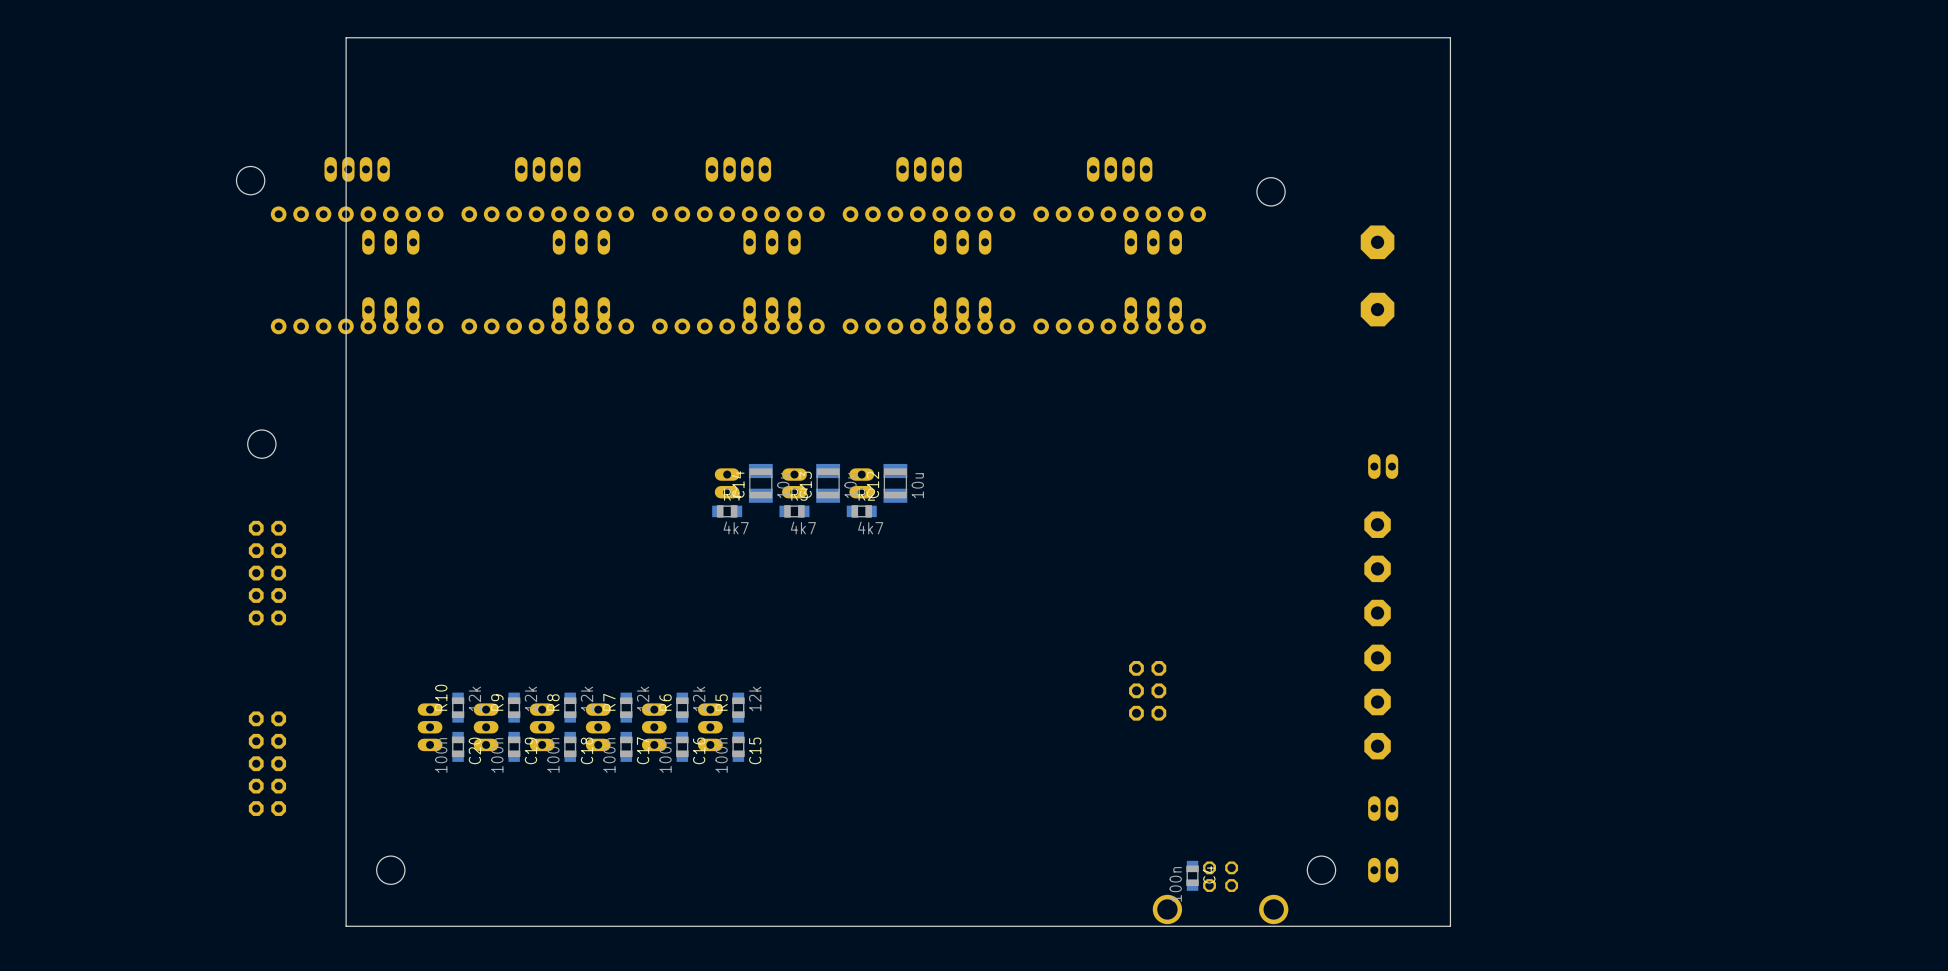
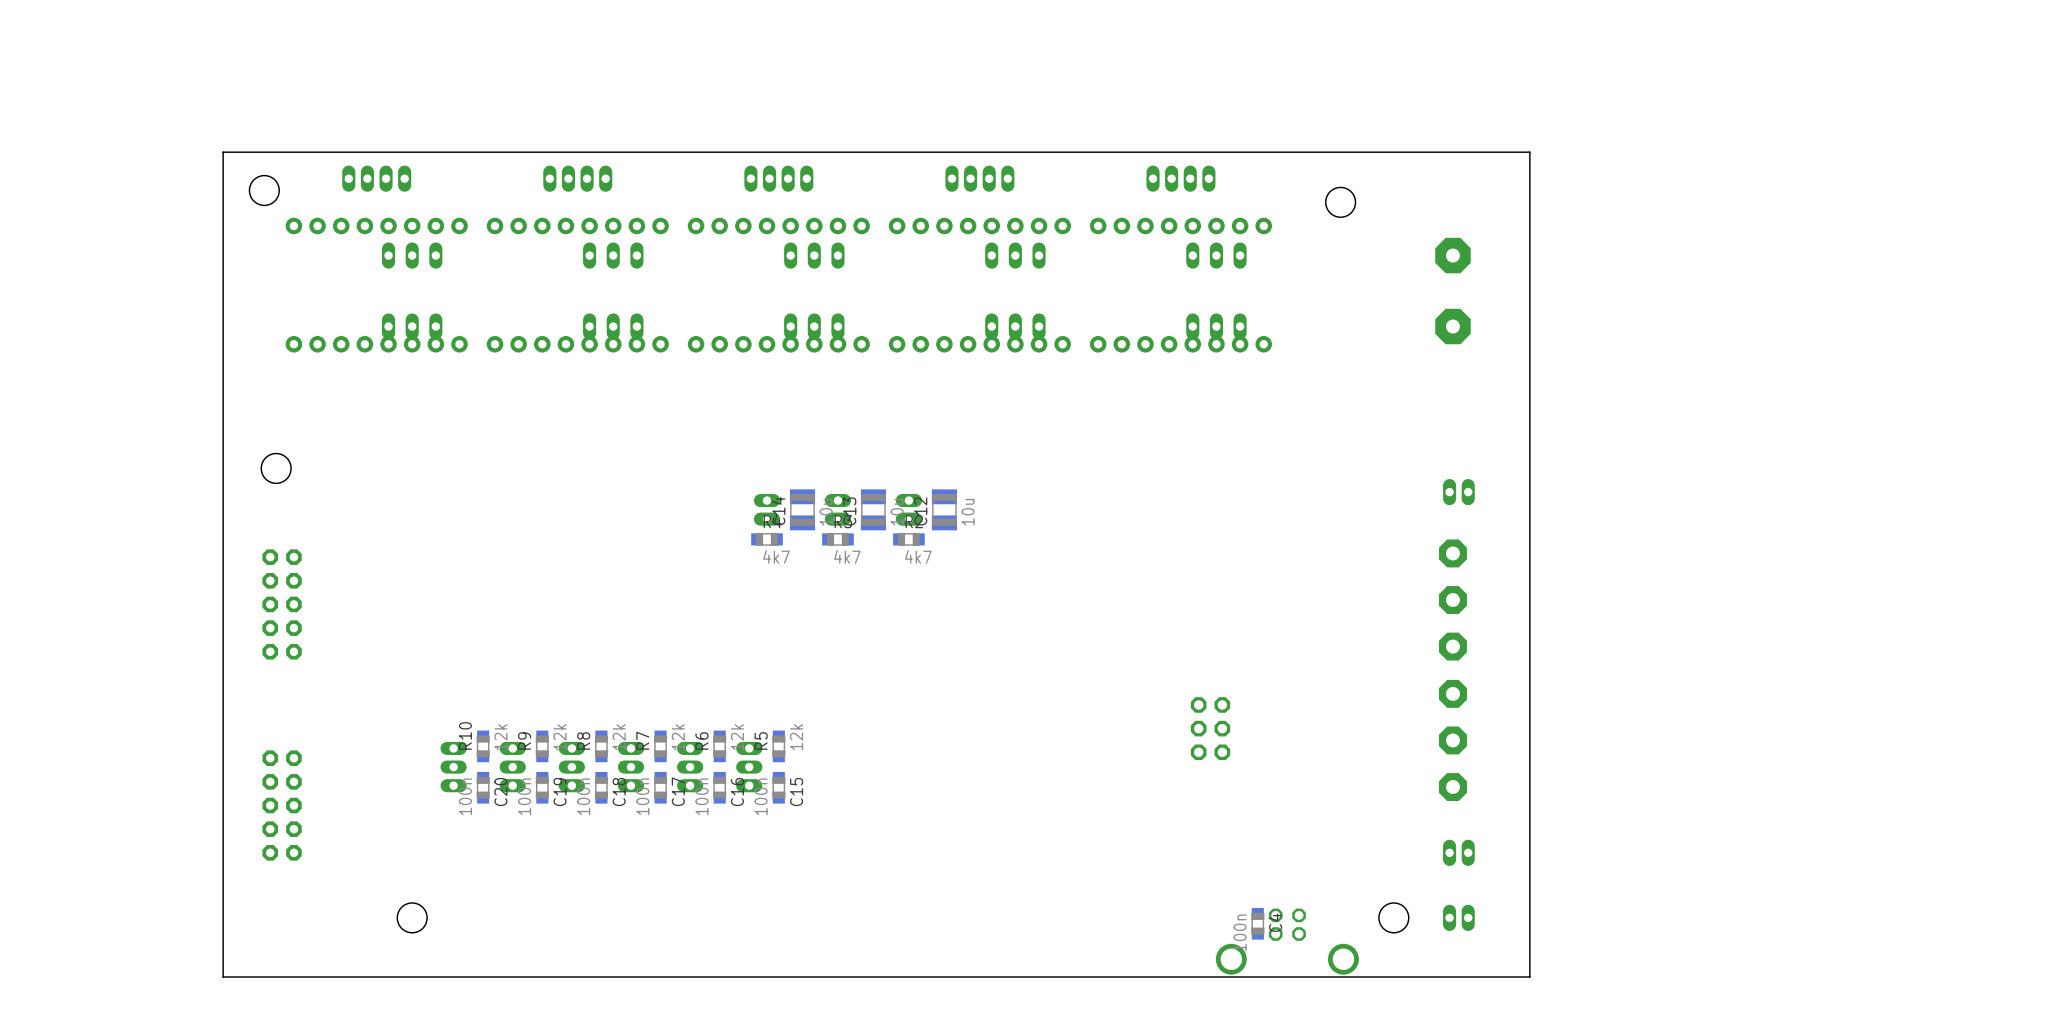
board edge: (1450, 144) (1450, 37) (346, 37) (346, 926) -> (1529, 152) (223, 152) (223, 977) (365, 977)

